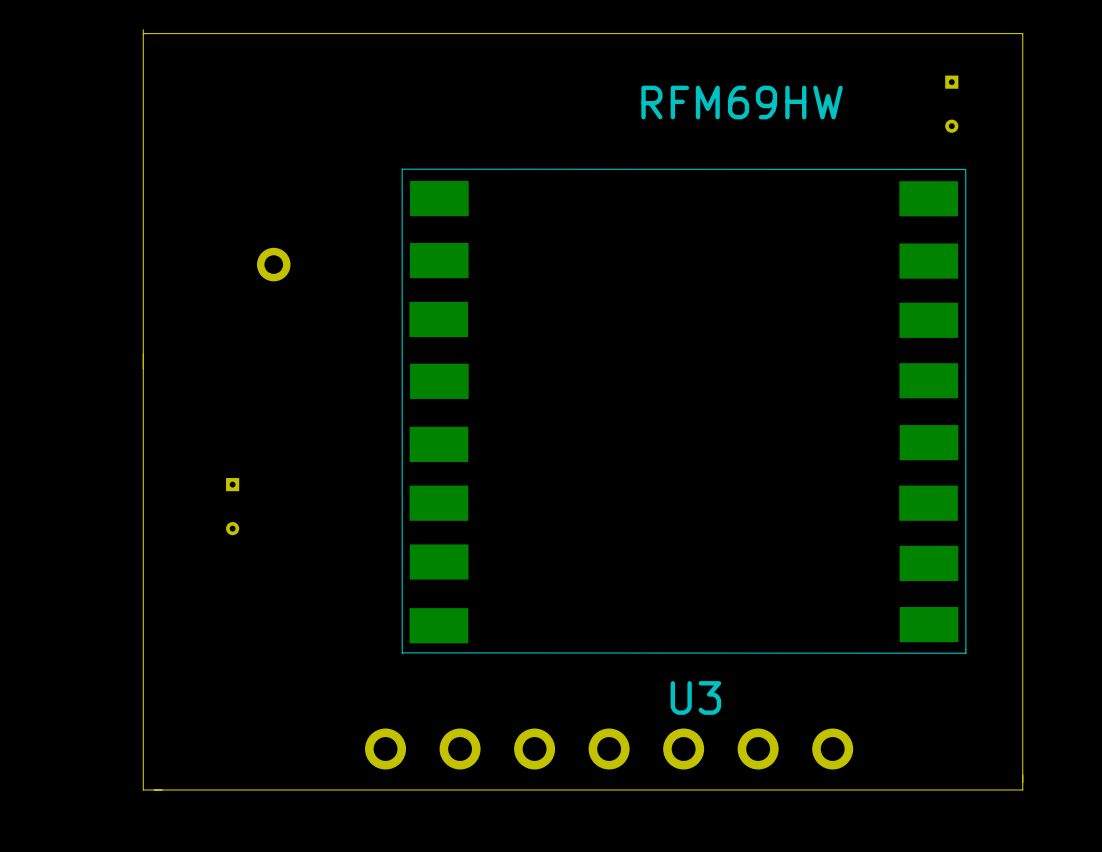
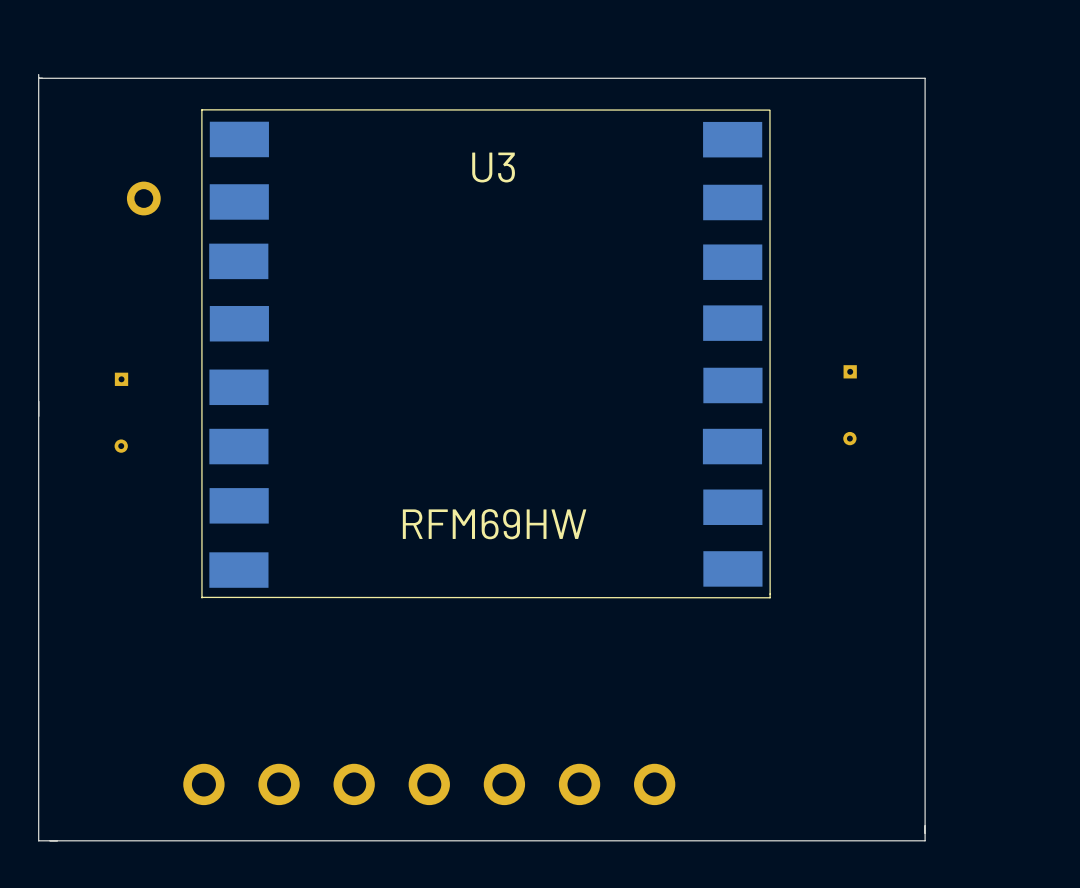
U3 value position: RFM69HW (742, 102) -> RFM69HW (494, 524)
part: (951, 104) -> none
part position: (273, 264) -> (143, 198)
part: none -> (850, 405)
part: none -> (121, 412)
U3 position: (684, 411) -> (486, 353)
part: (232, 506) -> none
U3 name position: U3 (695, 697) -> U3 (493, 167)
part position: (609, 749) -> (429, 784)

